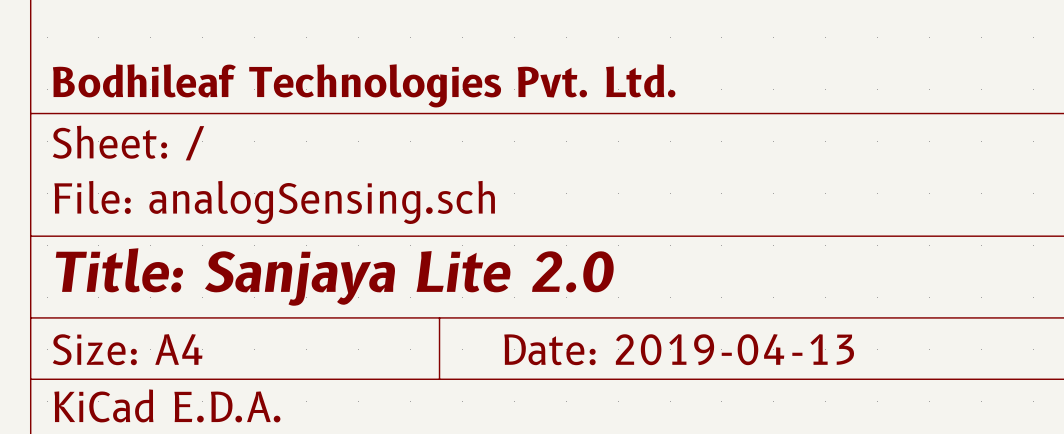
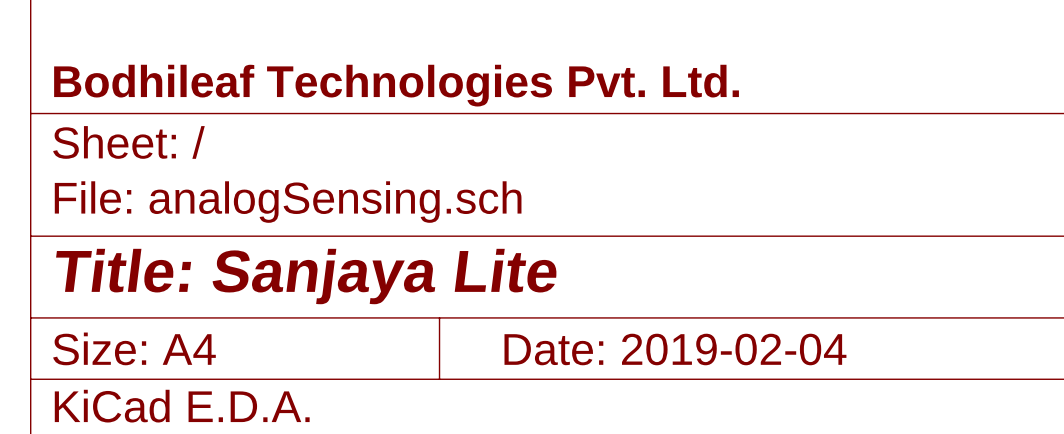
title block: Title: Sanjaya Lite 2.0 (334, 276) -> Title: Sanjaya Lite (306, 276)
title block: Date: 2019-04-13 (679, 349) -> Date: 2019-02-04 (675, 349)

